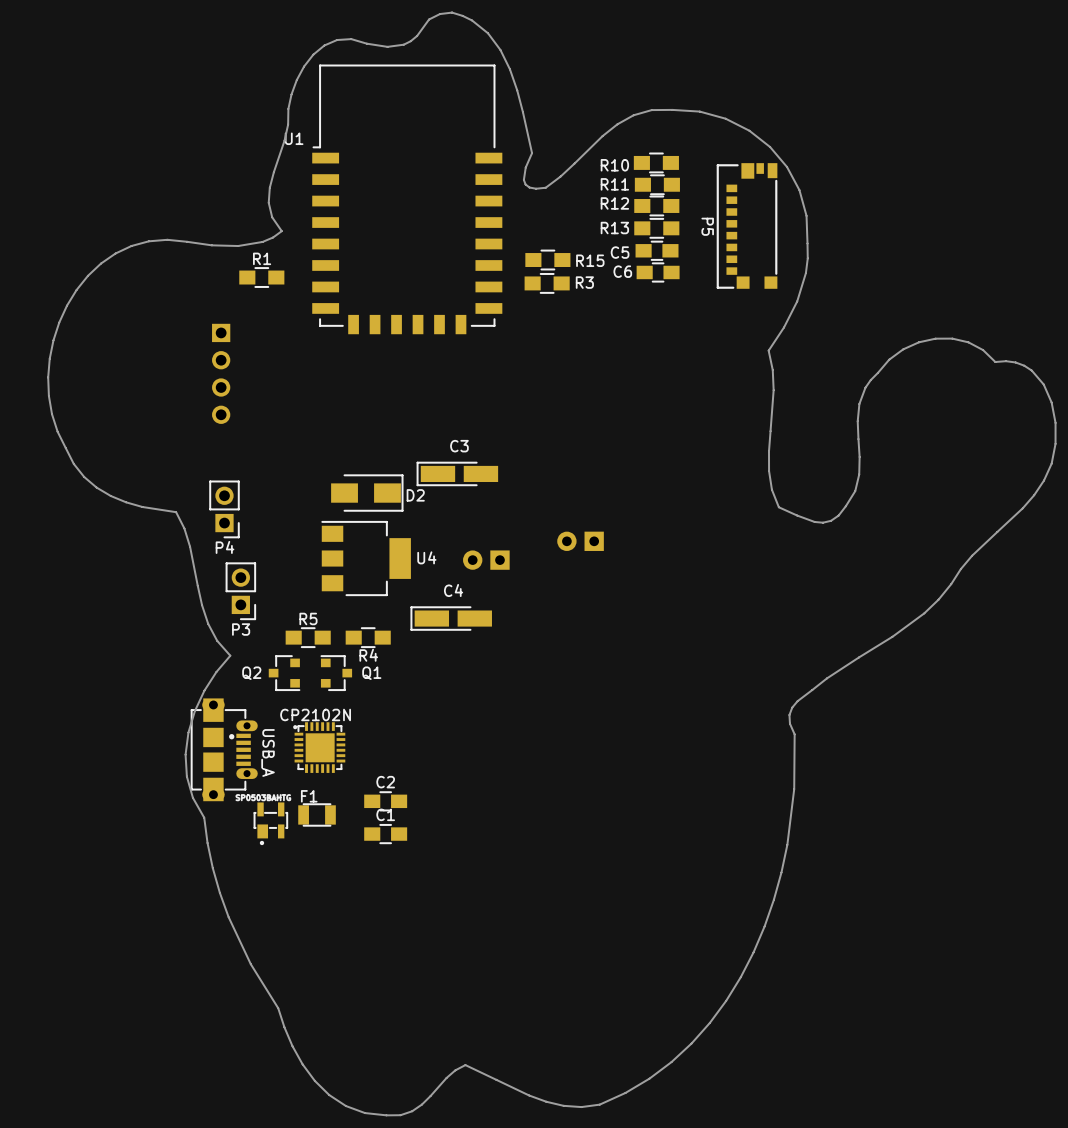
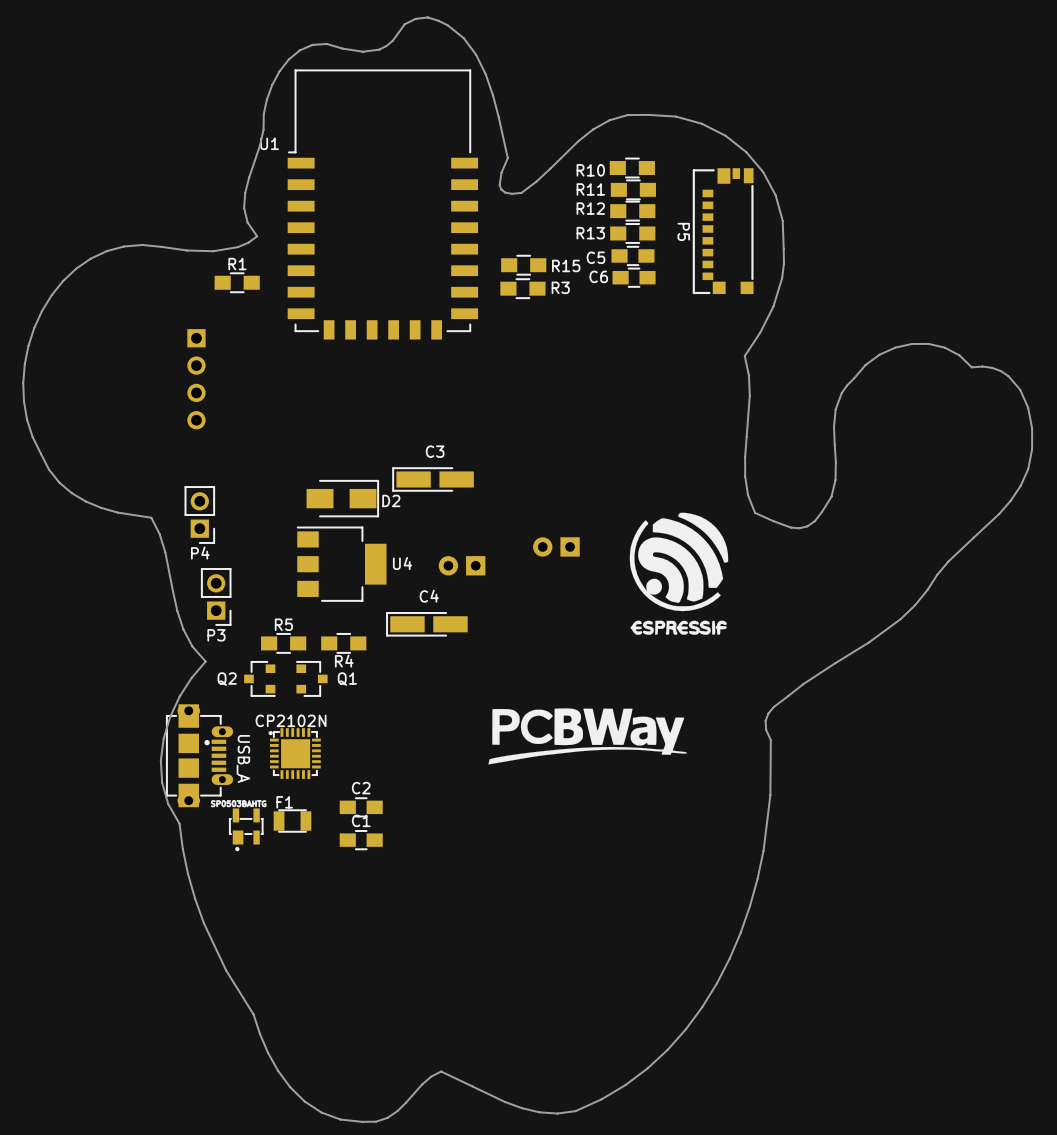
drawing: none -> [629, 512, 729, 635]
drawing: none -> [488, 708, 688, 765]

